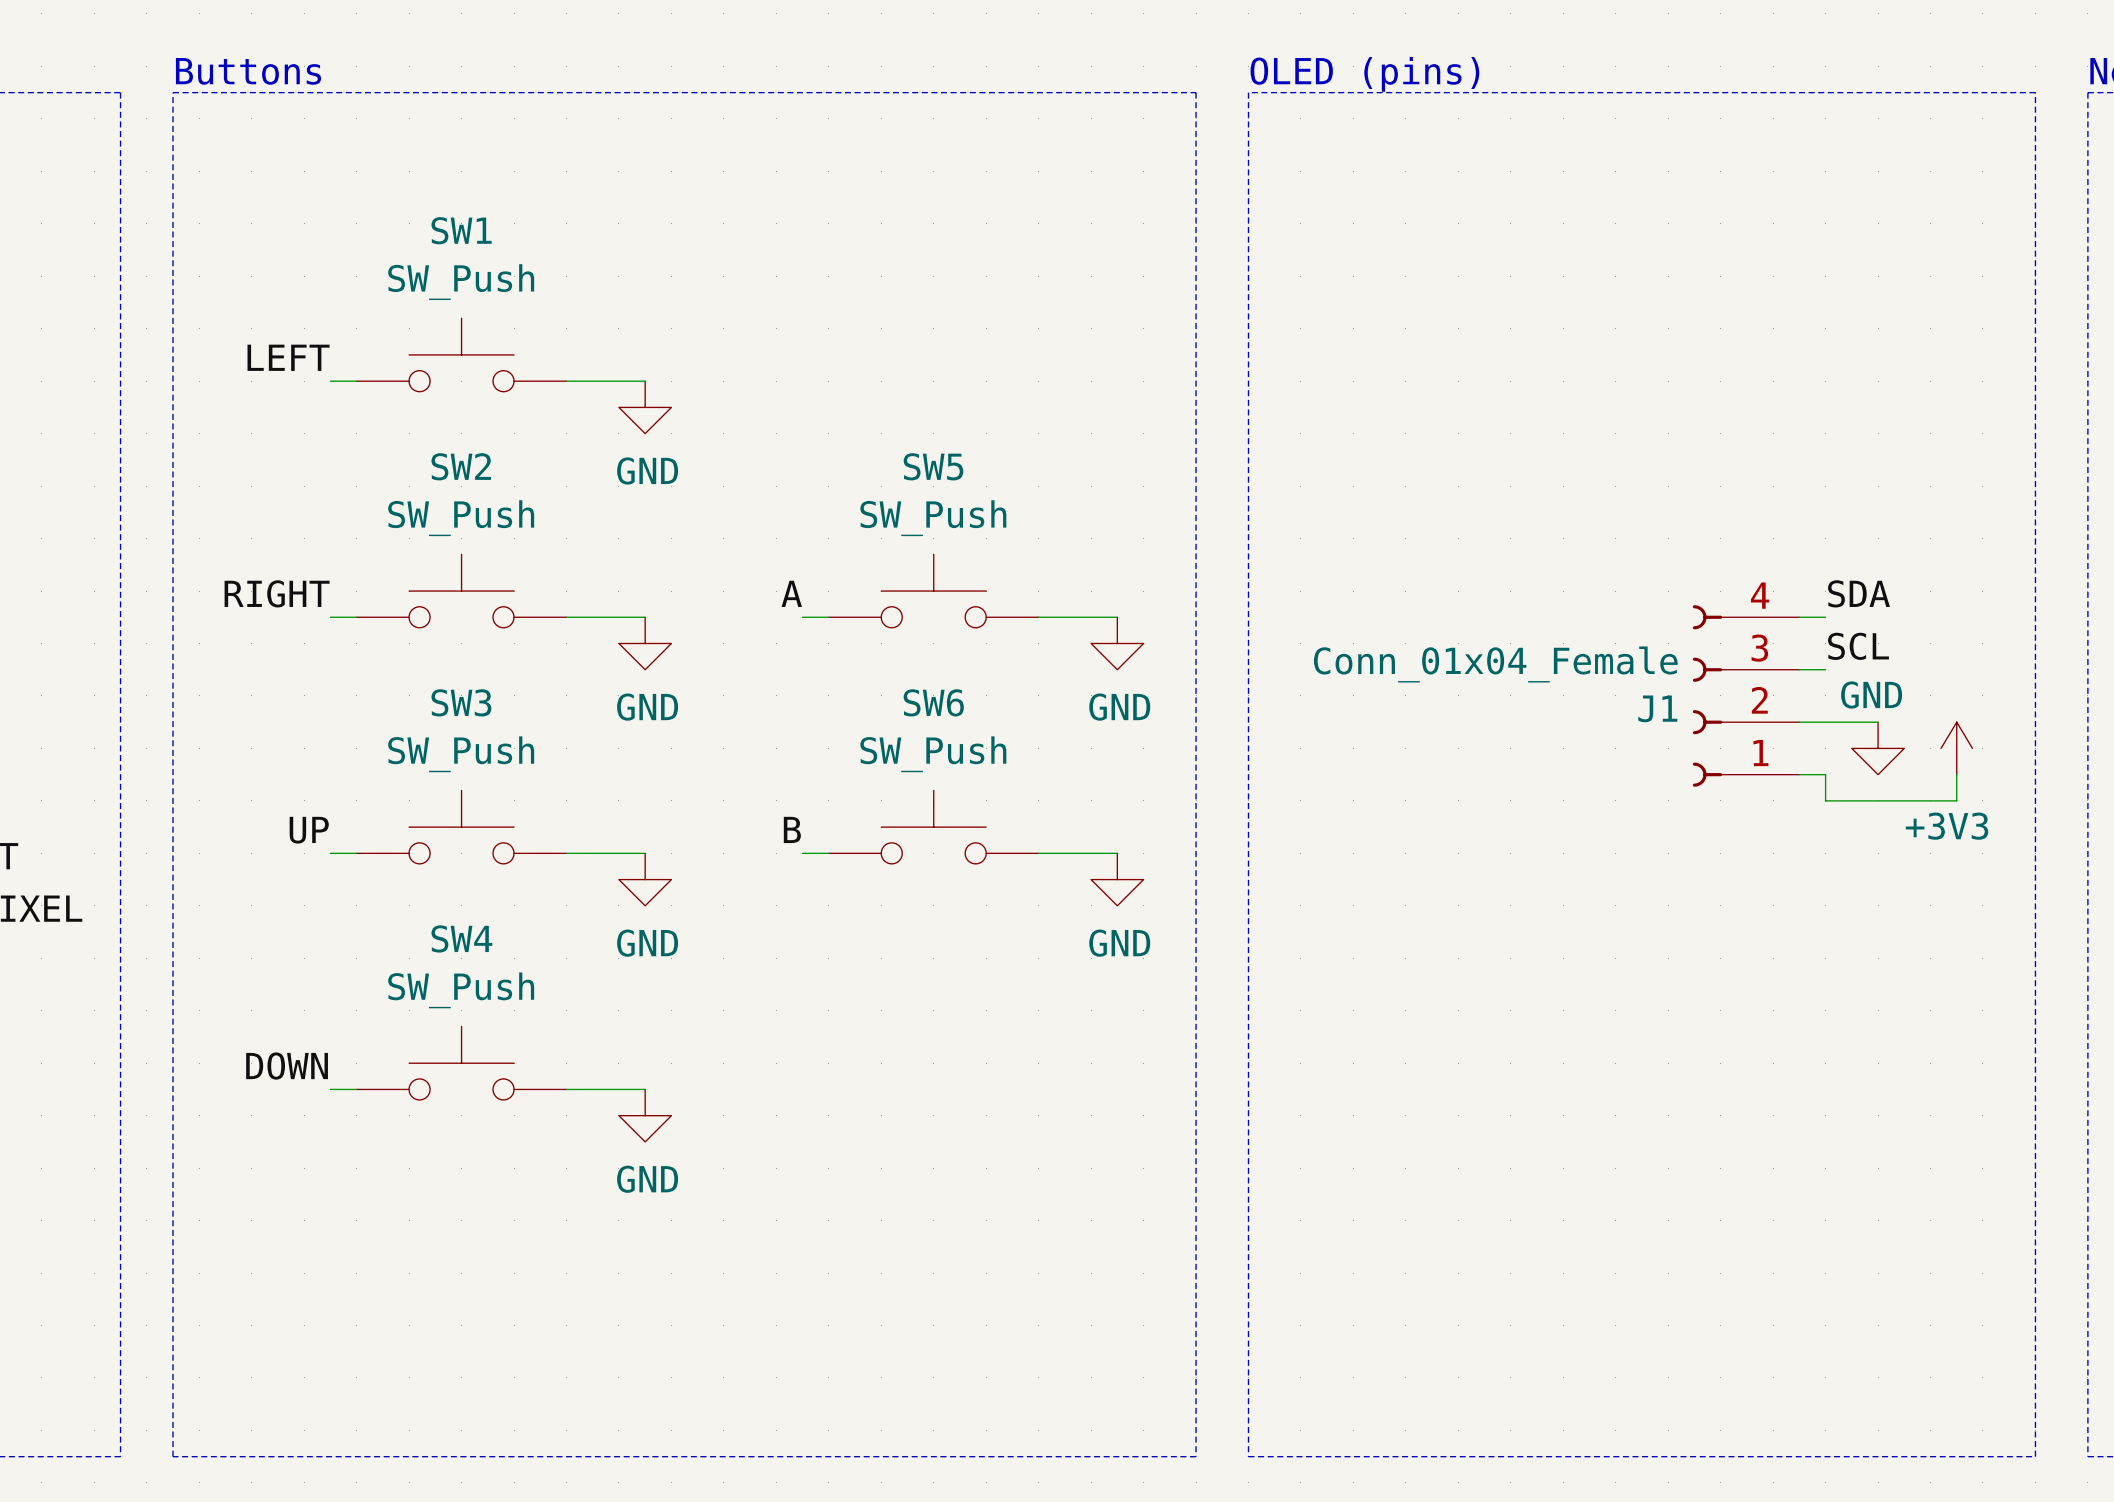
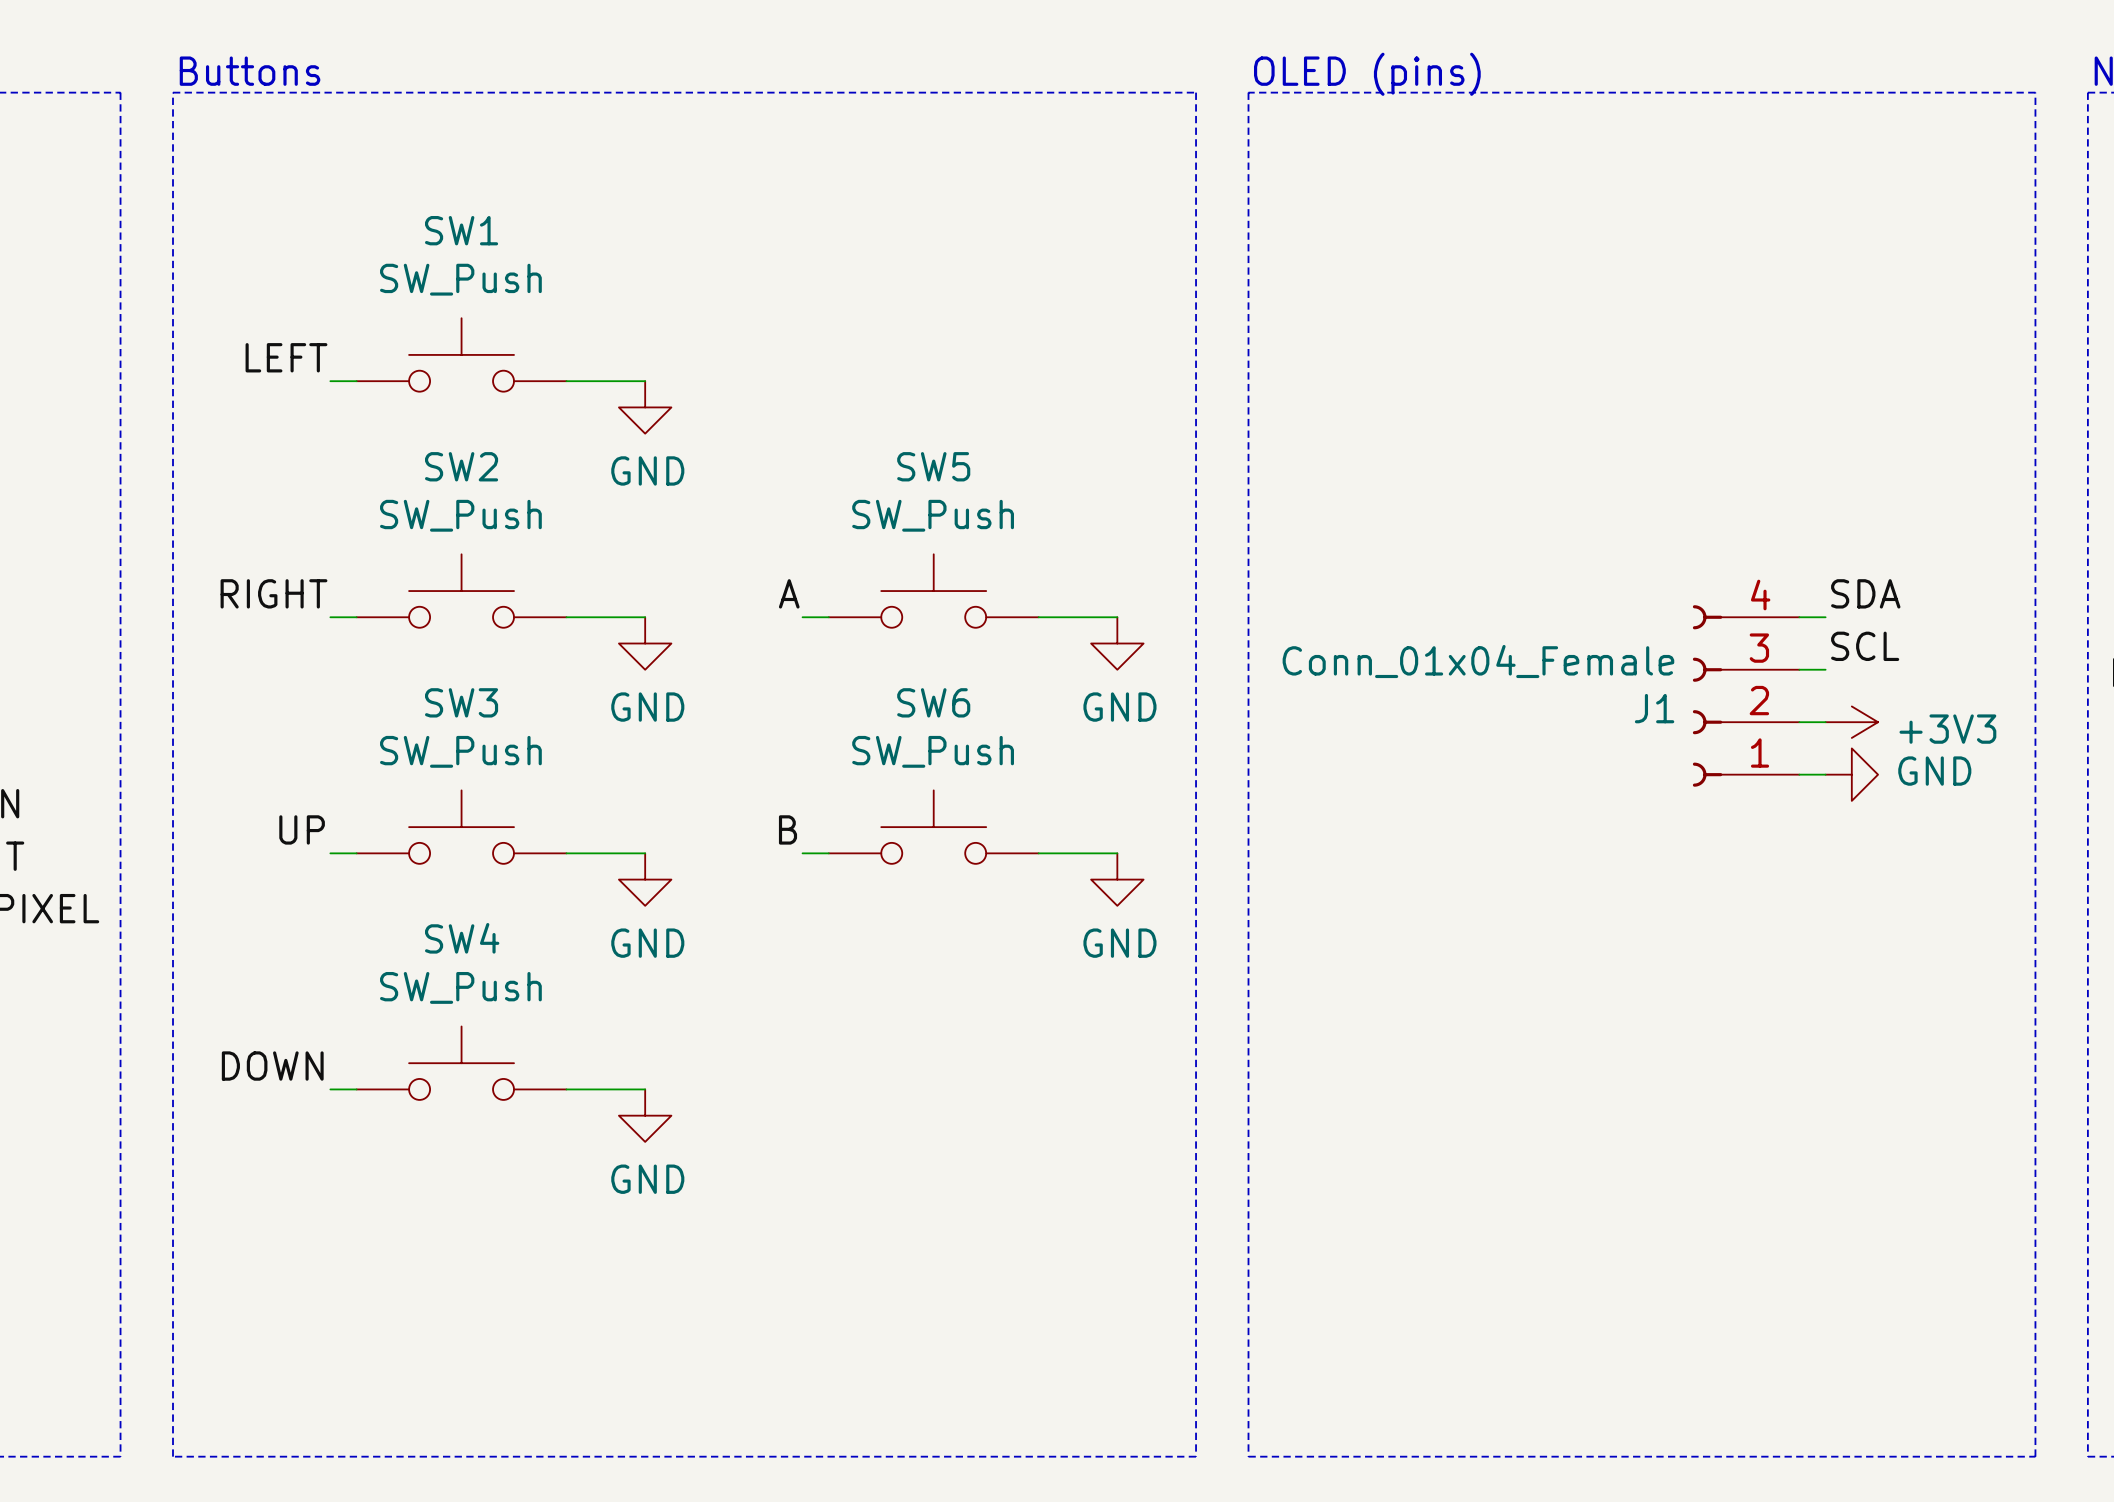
power symbol text position: GND (1871, 695) -> GND (1934, 771)
power symbol rotation: 0° (1878, 748) -> 90° counterclockwise (1851, 774)
power symbol position: GND (1878, 748) -> GND (1851, 774)
power symbol rotation: 0° (1956, 748) -> 90° clockwise (1851, 722)
power symbol position: +3V3 (1956, 748) -> +3V3 (1851, 722)
wire: (1825, 774) (1825, 800) (1956, 800) (1956, 774) -> none
power symbol text position: +3V3 (1947, 826) -> +3V3 (1947, 729)

